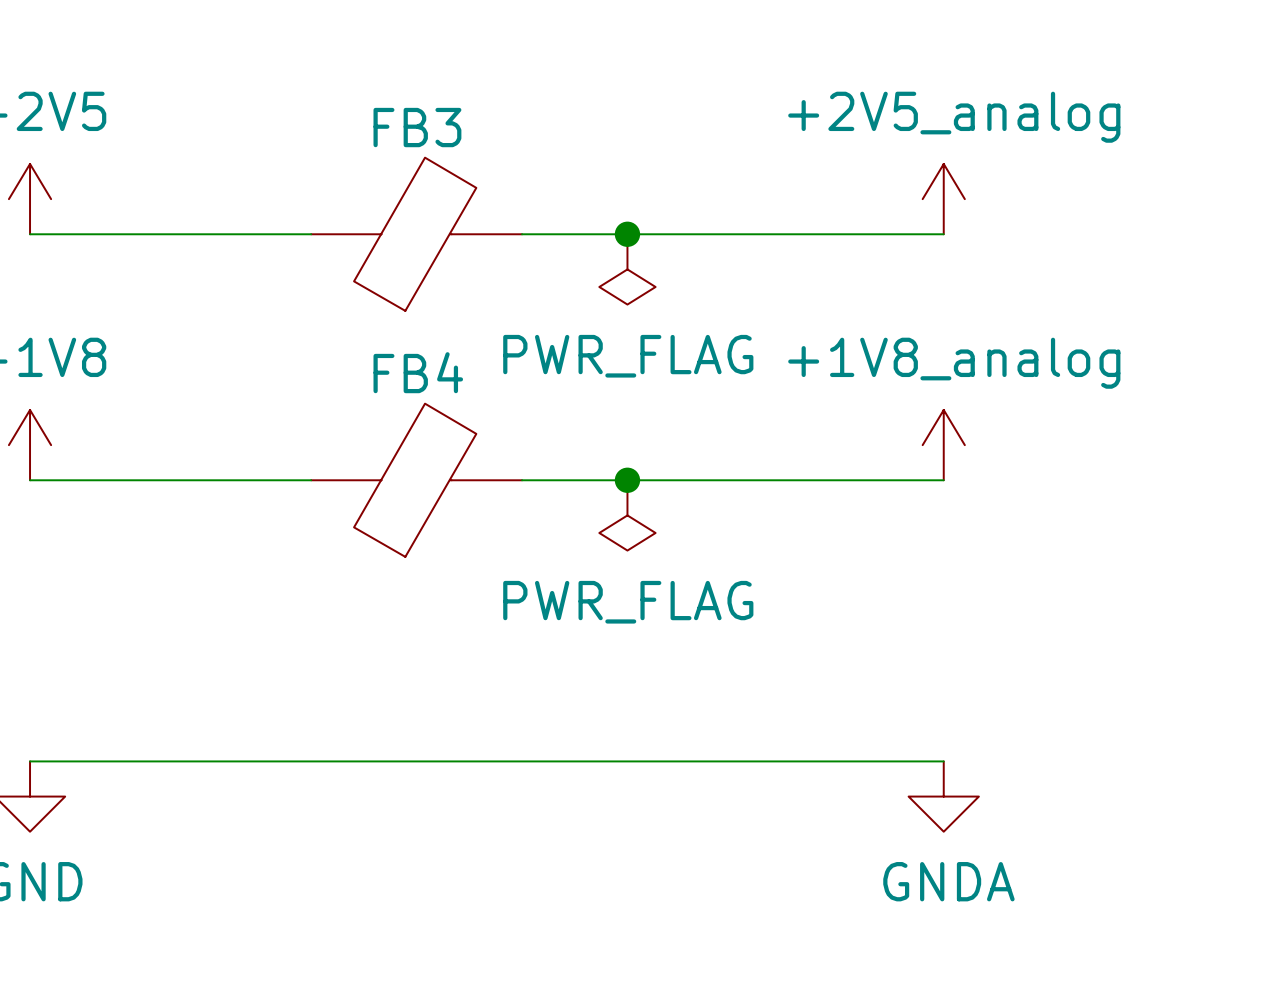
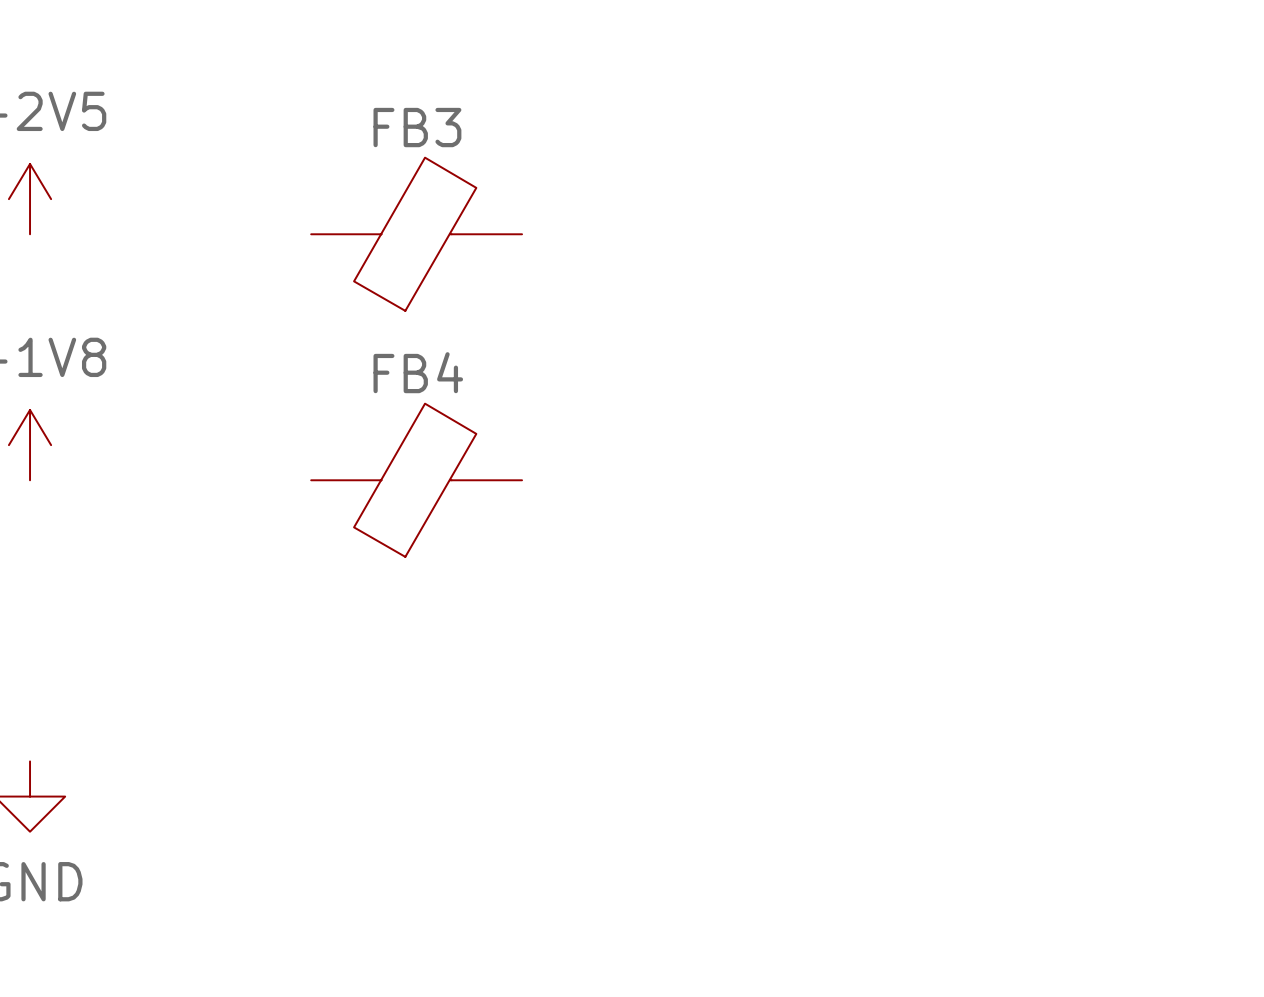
power symbol: +2V5_analog (943, 199) -> none
wire: (30, 234) (311, 234) -> none
wire: (522, 234) (943, 234) -> none
junction: (627, 234) -> none
power symbol: PWR_FLAG (627, 269) -> none
power symbol: +1V8_analog (943, 445) -> none
wire: (30, 480) (311, 480) -> none
wire: (522, 480) (943, 480) -> none
junction: (627, 480) -> none
power symbol: PWR_FLAG (627, 515) -> none
wire: (30, 761) (943, 761) -> none
power symbol: GNDA (943, 796) -> none

